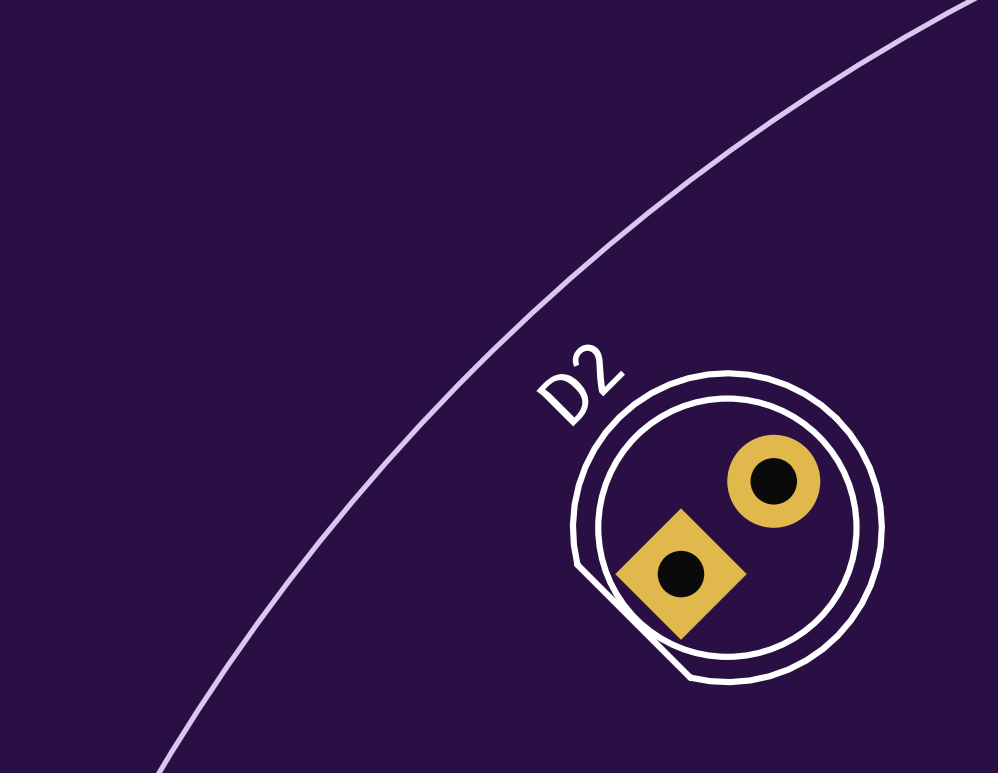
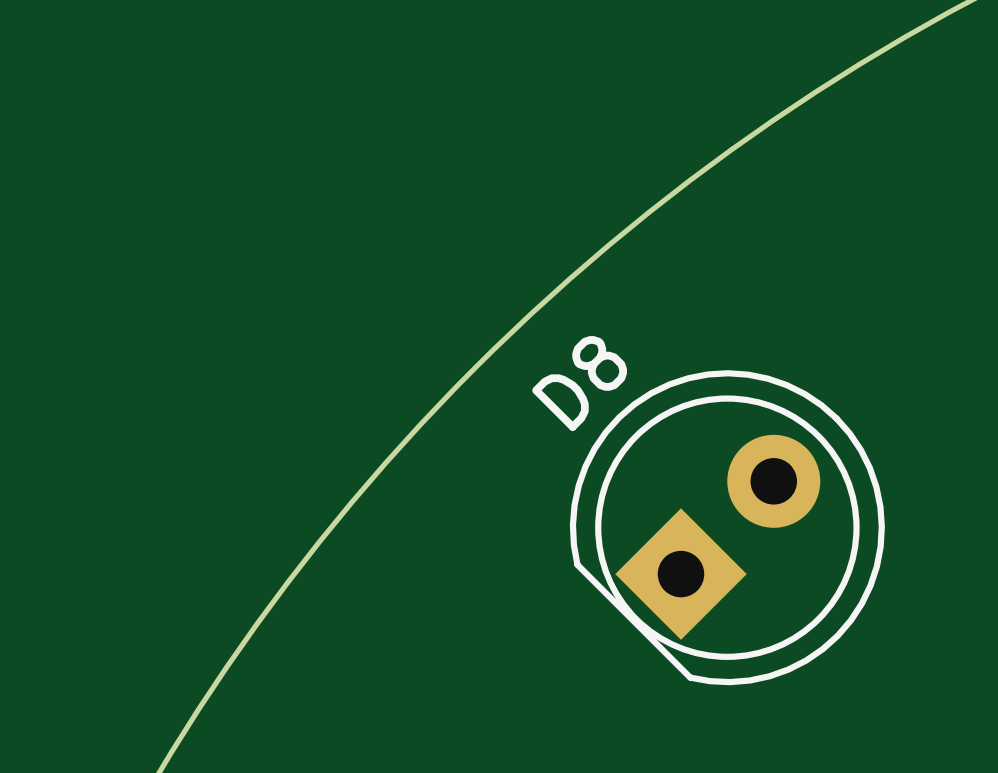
D2 name: D2 (580, 385) -> D8 (579, 383)

